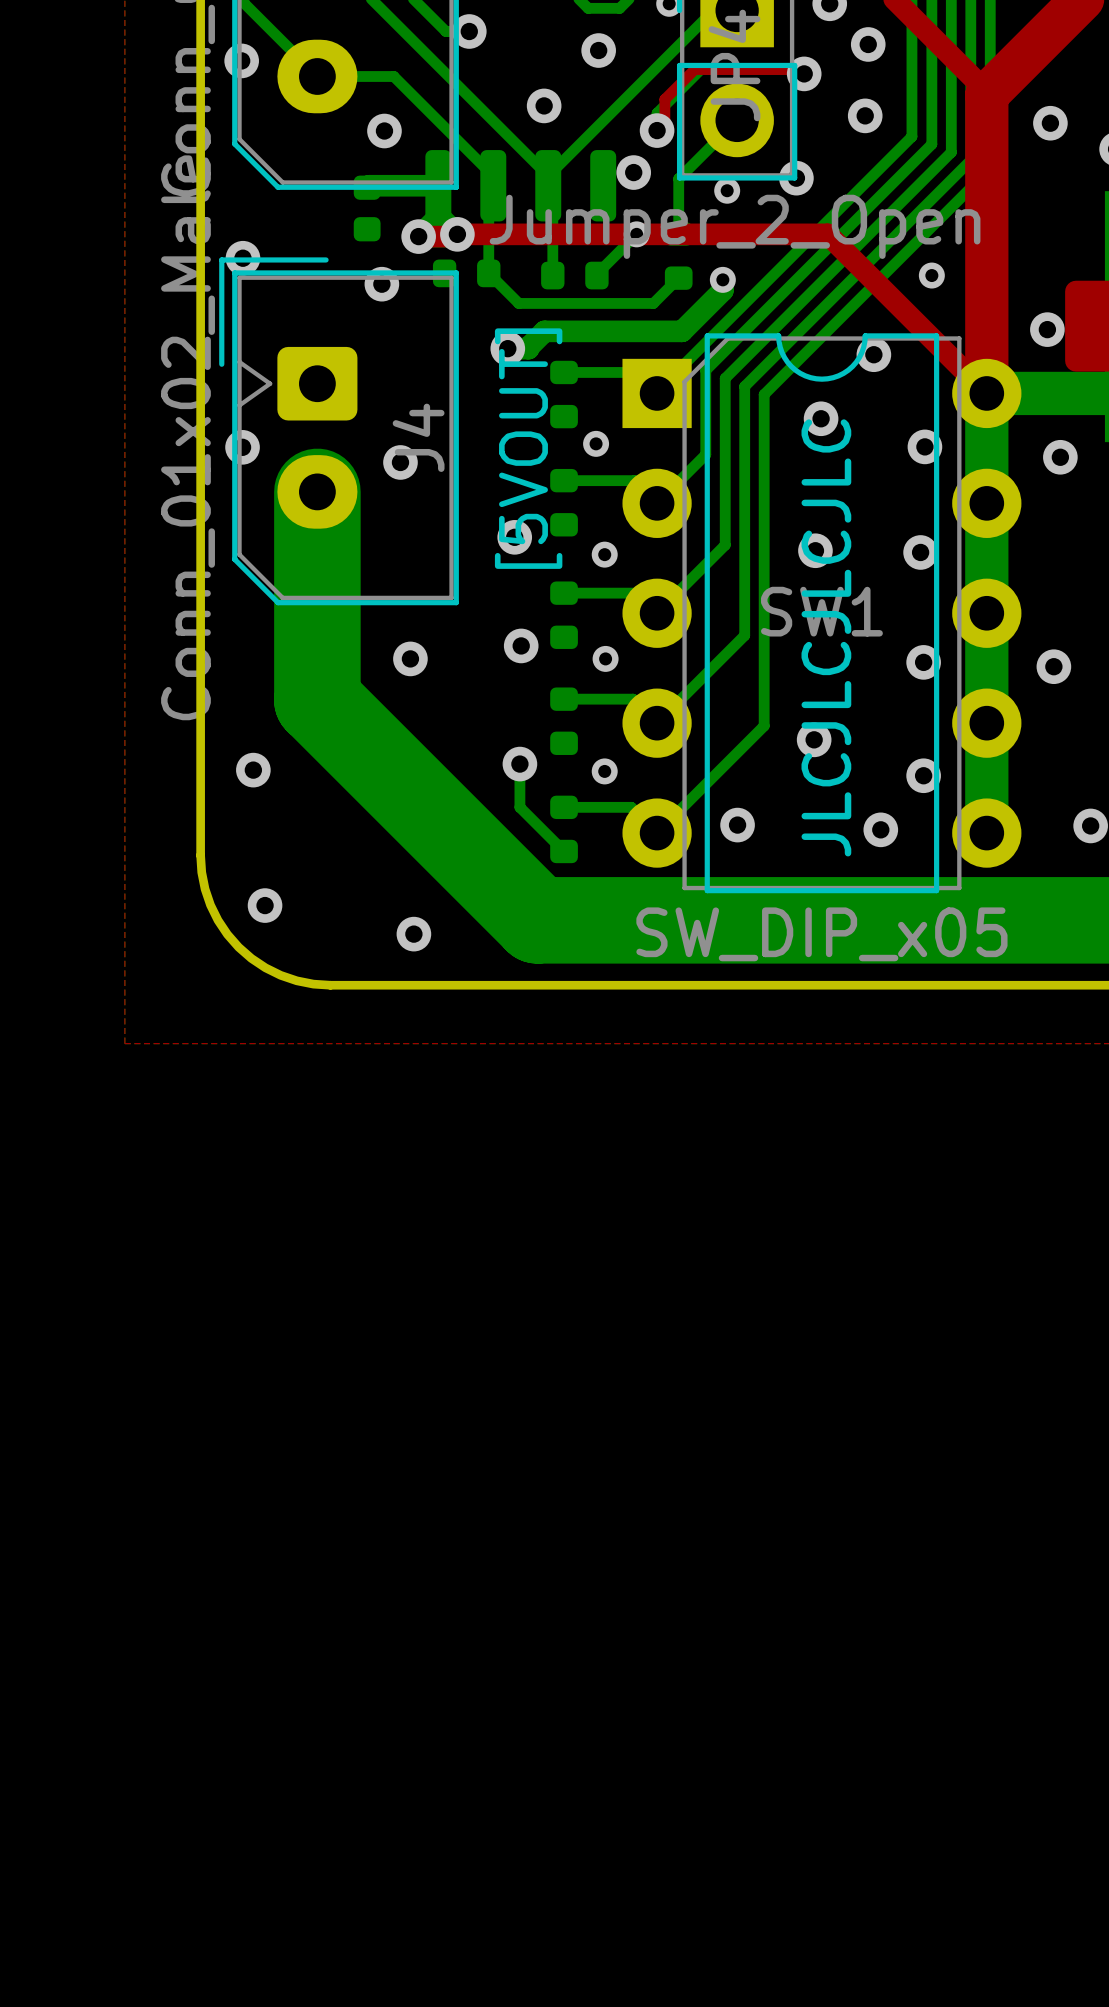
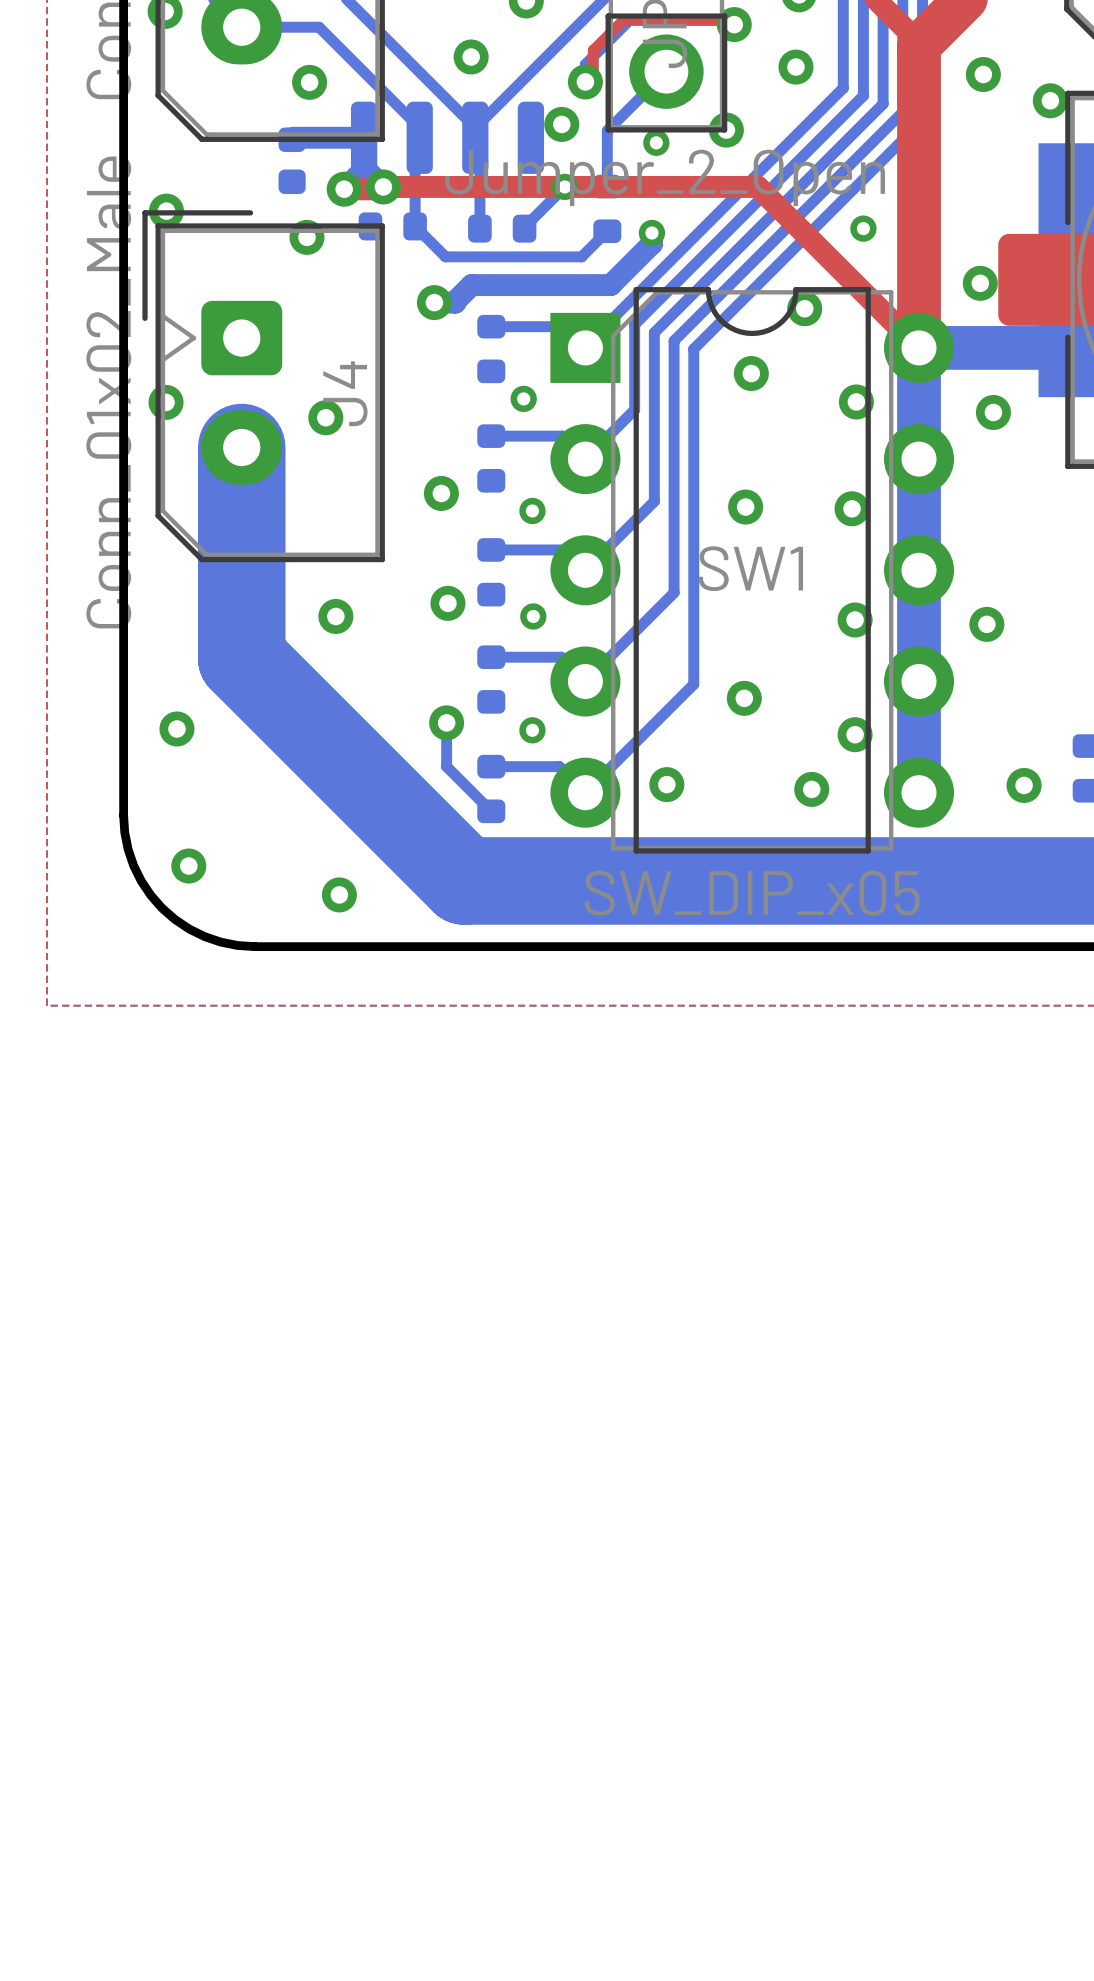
text: [5VOUT] (528, 448) -> none
text: JLCJLCJLCJLC (826, 637) -> none

